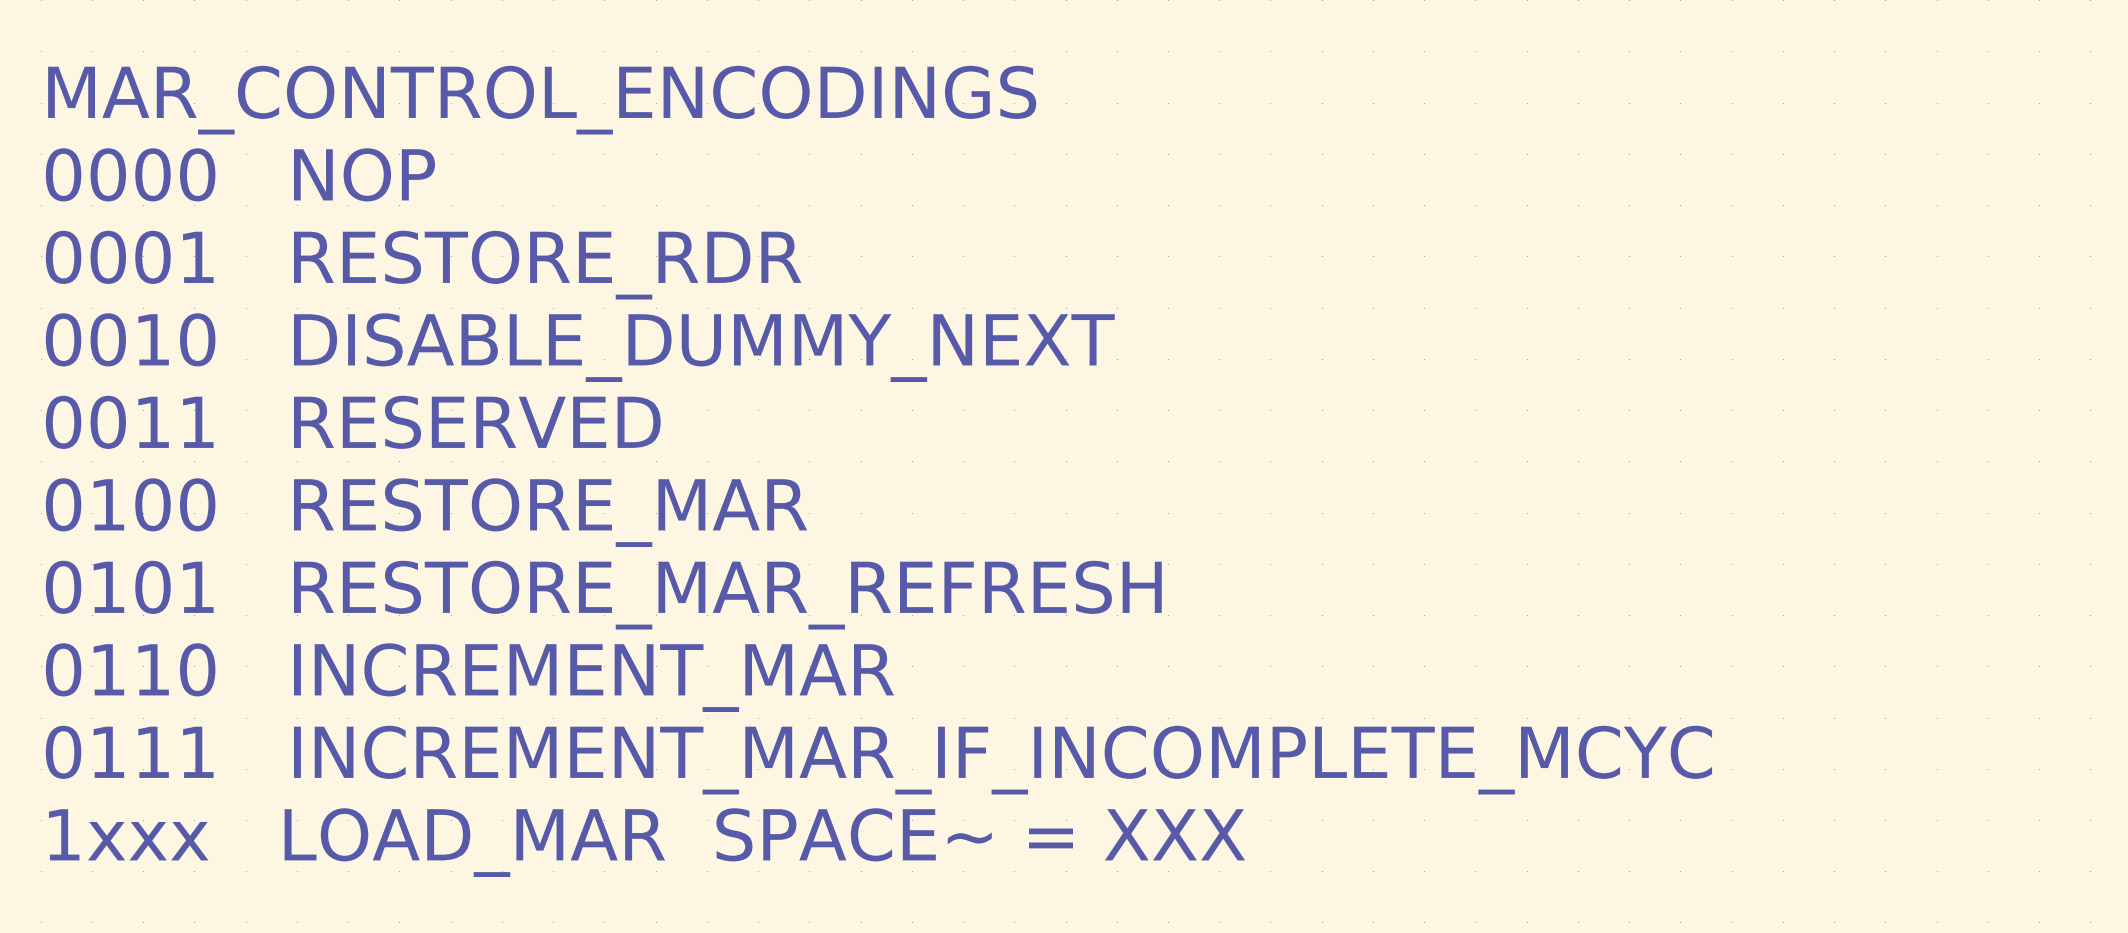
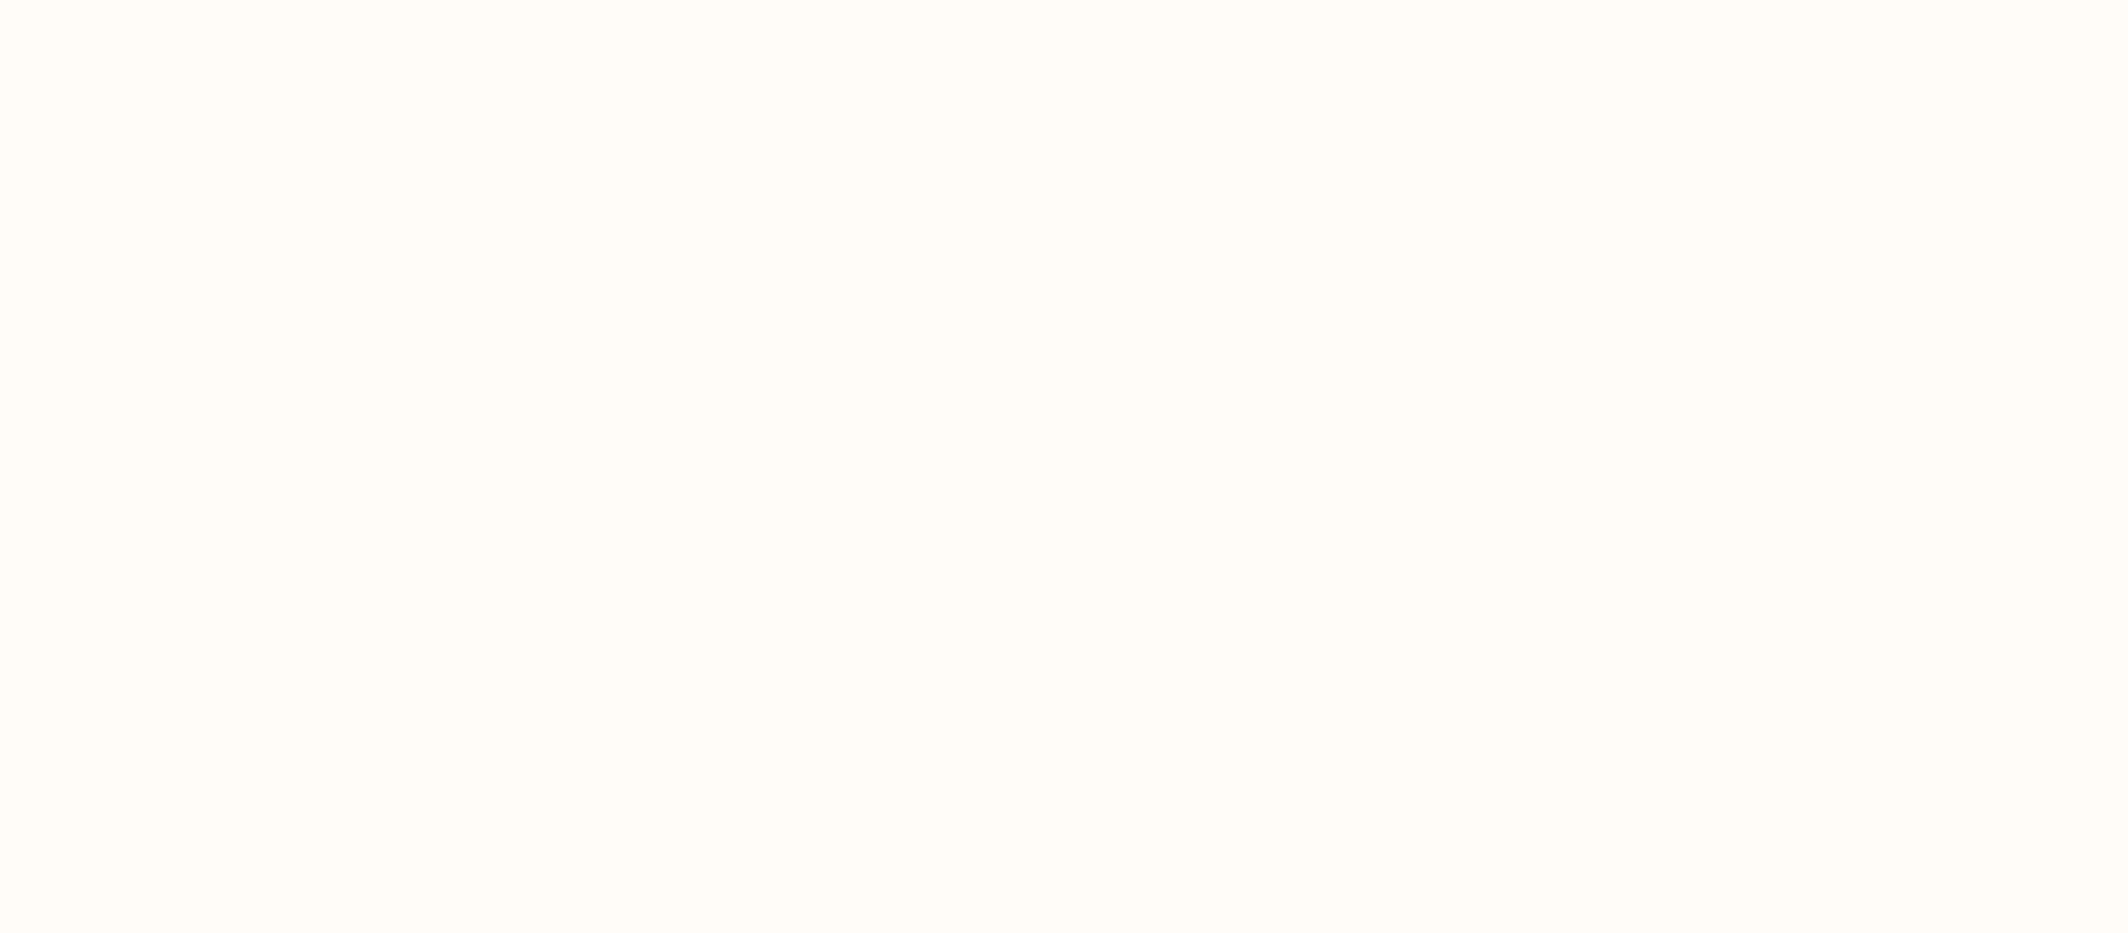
text: MAR_CONTROL_ENCODINGS (542, 100) -> none
text: 0000 NOP (240, 174) -> none
text: 0001 RESTORE_RDR (423, 265) -> none
text: 0010 DISABLE_DUMMY_NEXT (580, 347) -> none
text: 0011 RESERVED (353, 422) -> none
text: 0100 RESTORE_MAR (426, 512) -> none
text: 0101 RESTORE_MAR_REFRESH (603, 595) -> none
text: 0110 INCREMENT_MAR (469, 677) -> none
text: 0111 INCREMENT_MAR_IF_INCOMPLETE_MCYC (878, 760) -> none
text: 1xxx LOAD_MAR SPACE~ = XXX (646, 842) -> none

